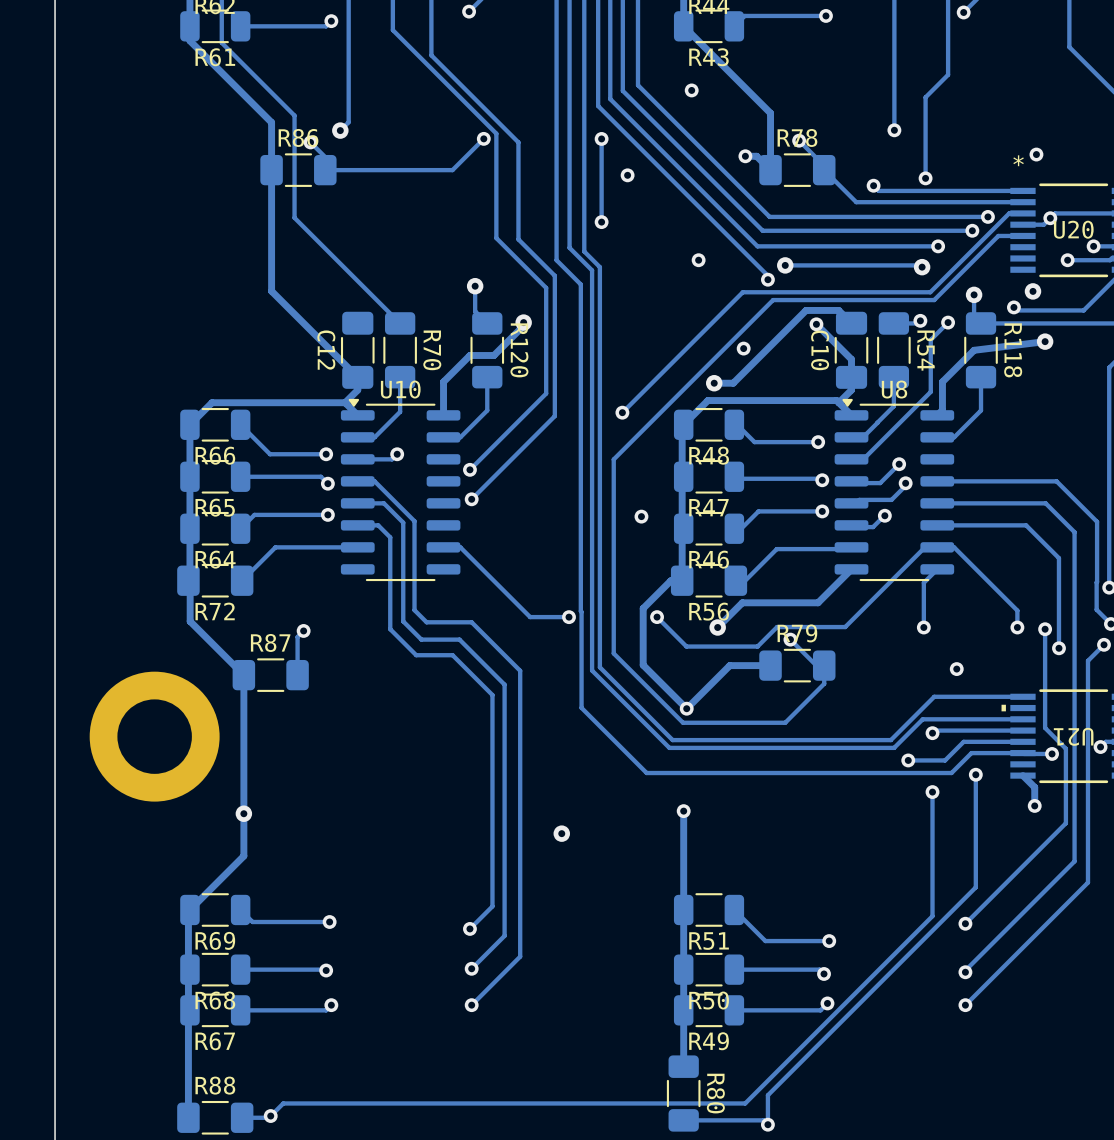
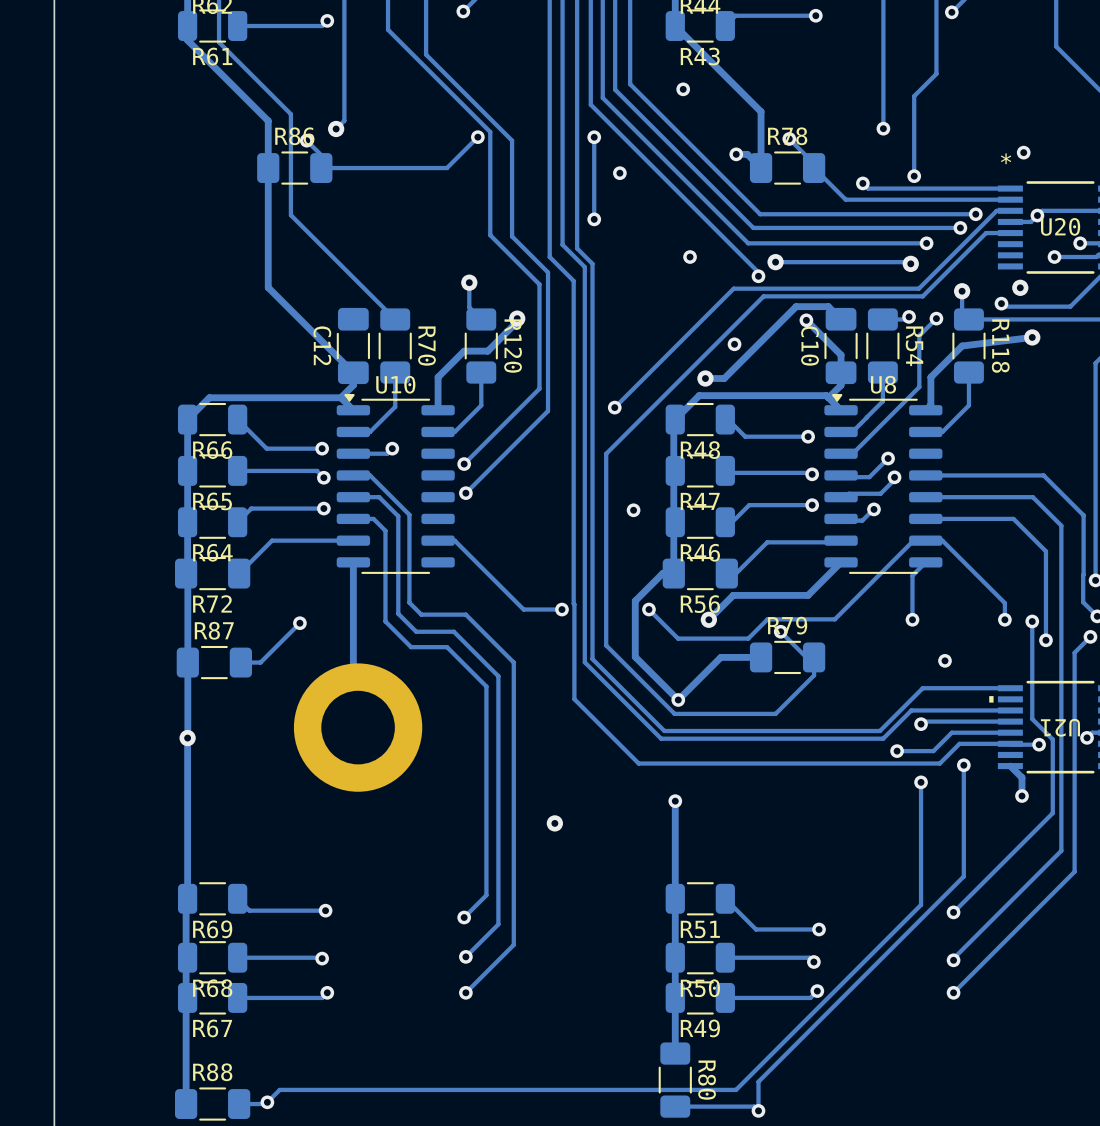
track: none -> (353, 562) (353, 671) (409, 727)
track: (190, 621) (243, 675) (243, 856) (189, 909) -> (187, 738) (187, 898)
track: none -> (187, 613) (187, 737)
track: (297, 637) (297, 675) -> (293, 629) (260, 662) (240, 662)
R87 position: (270, 675) -> (214, 662)
part position: (154, 736) -> (358, 727)
via position: (243, 813) -> (187, 738)

